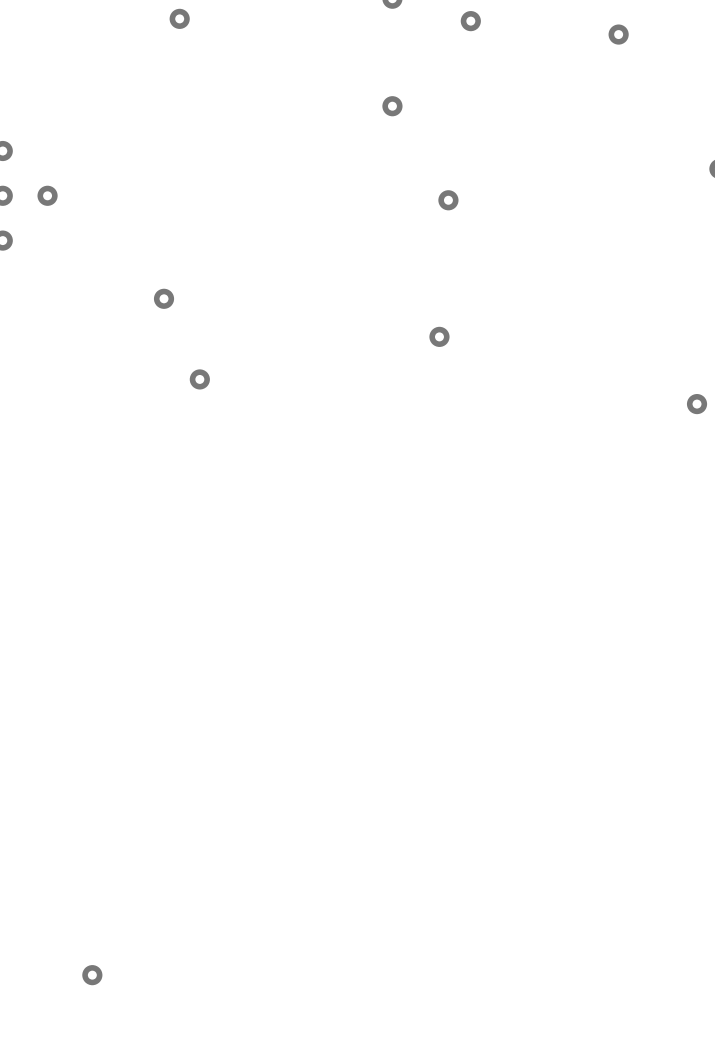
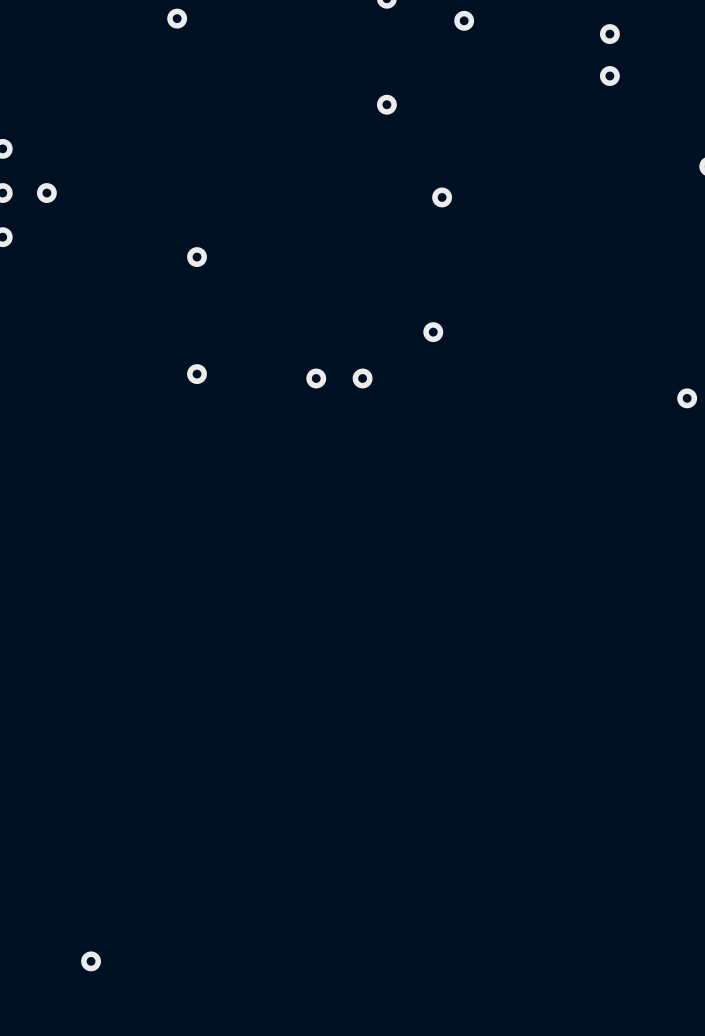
via: none -> (609, 76)
via position: (164, 298) -> (197, 257)
via: none -> (316, 378)
via: none -> (362, 378)

